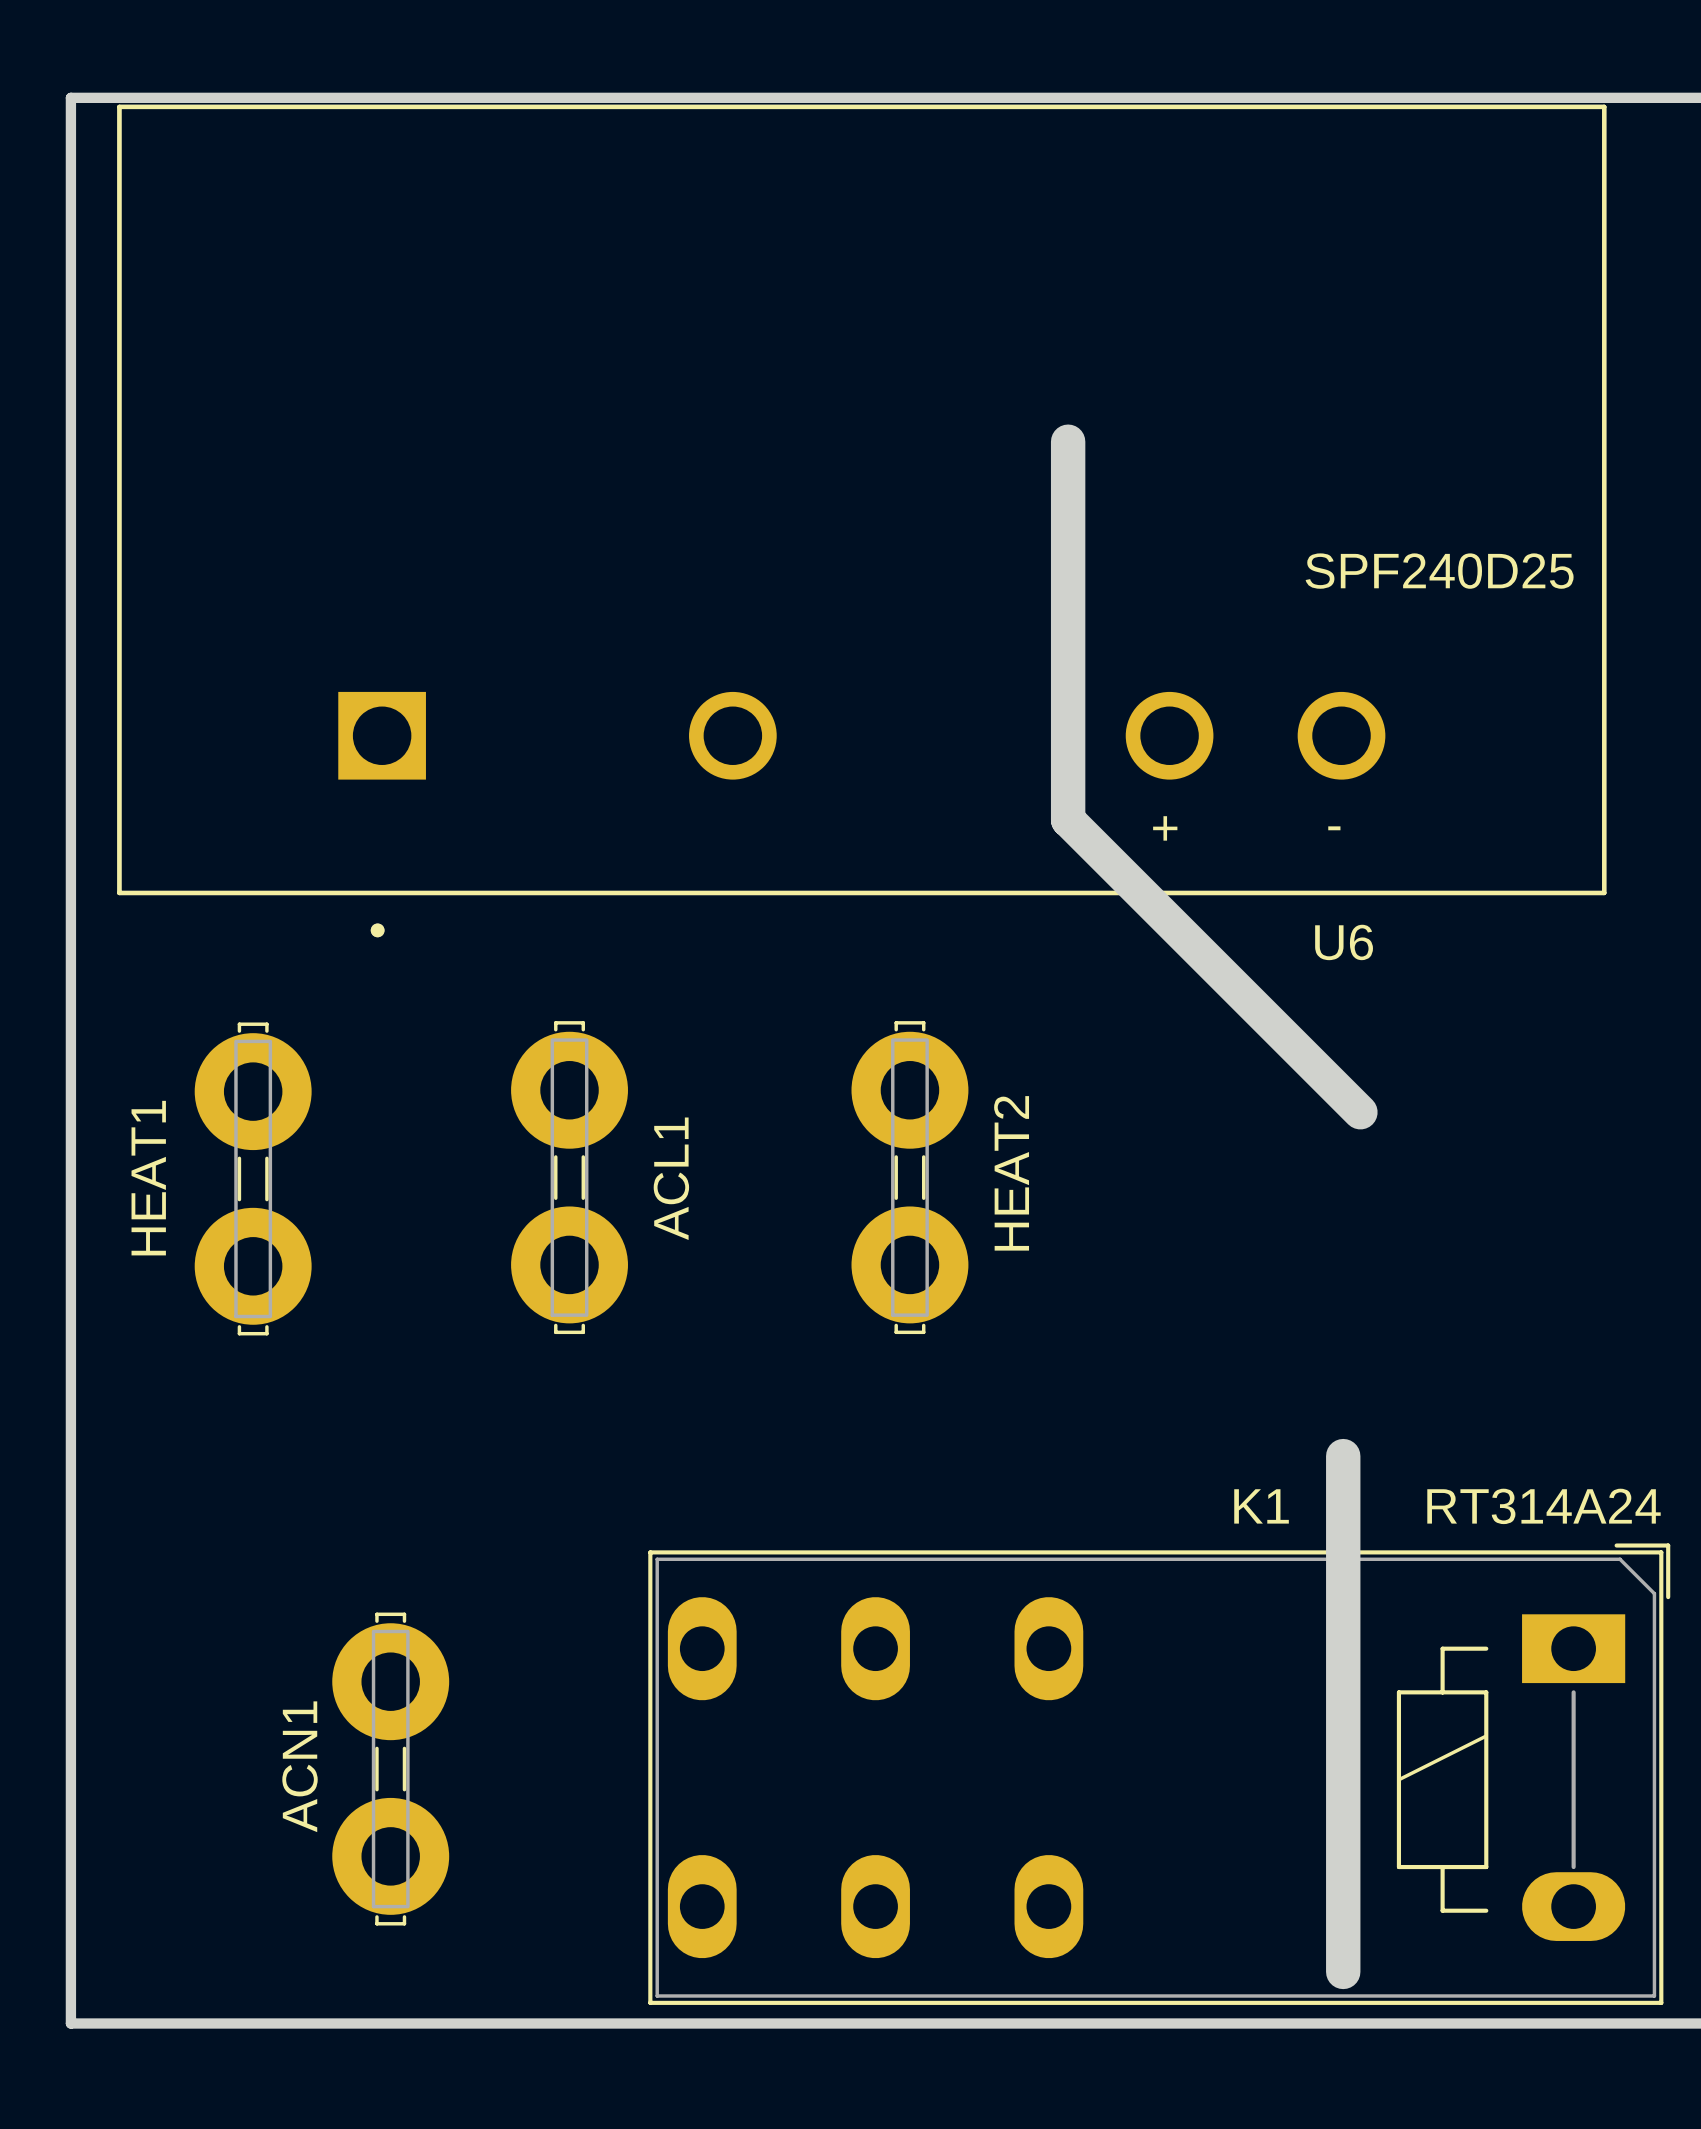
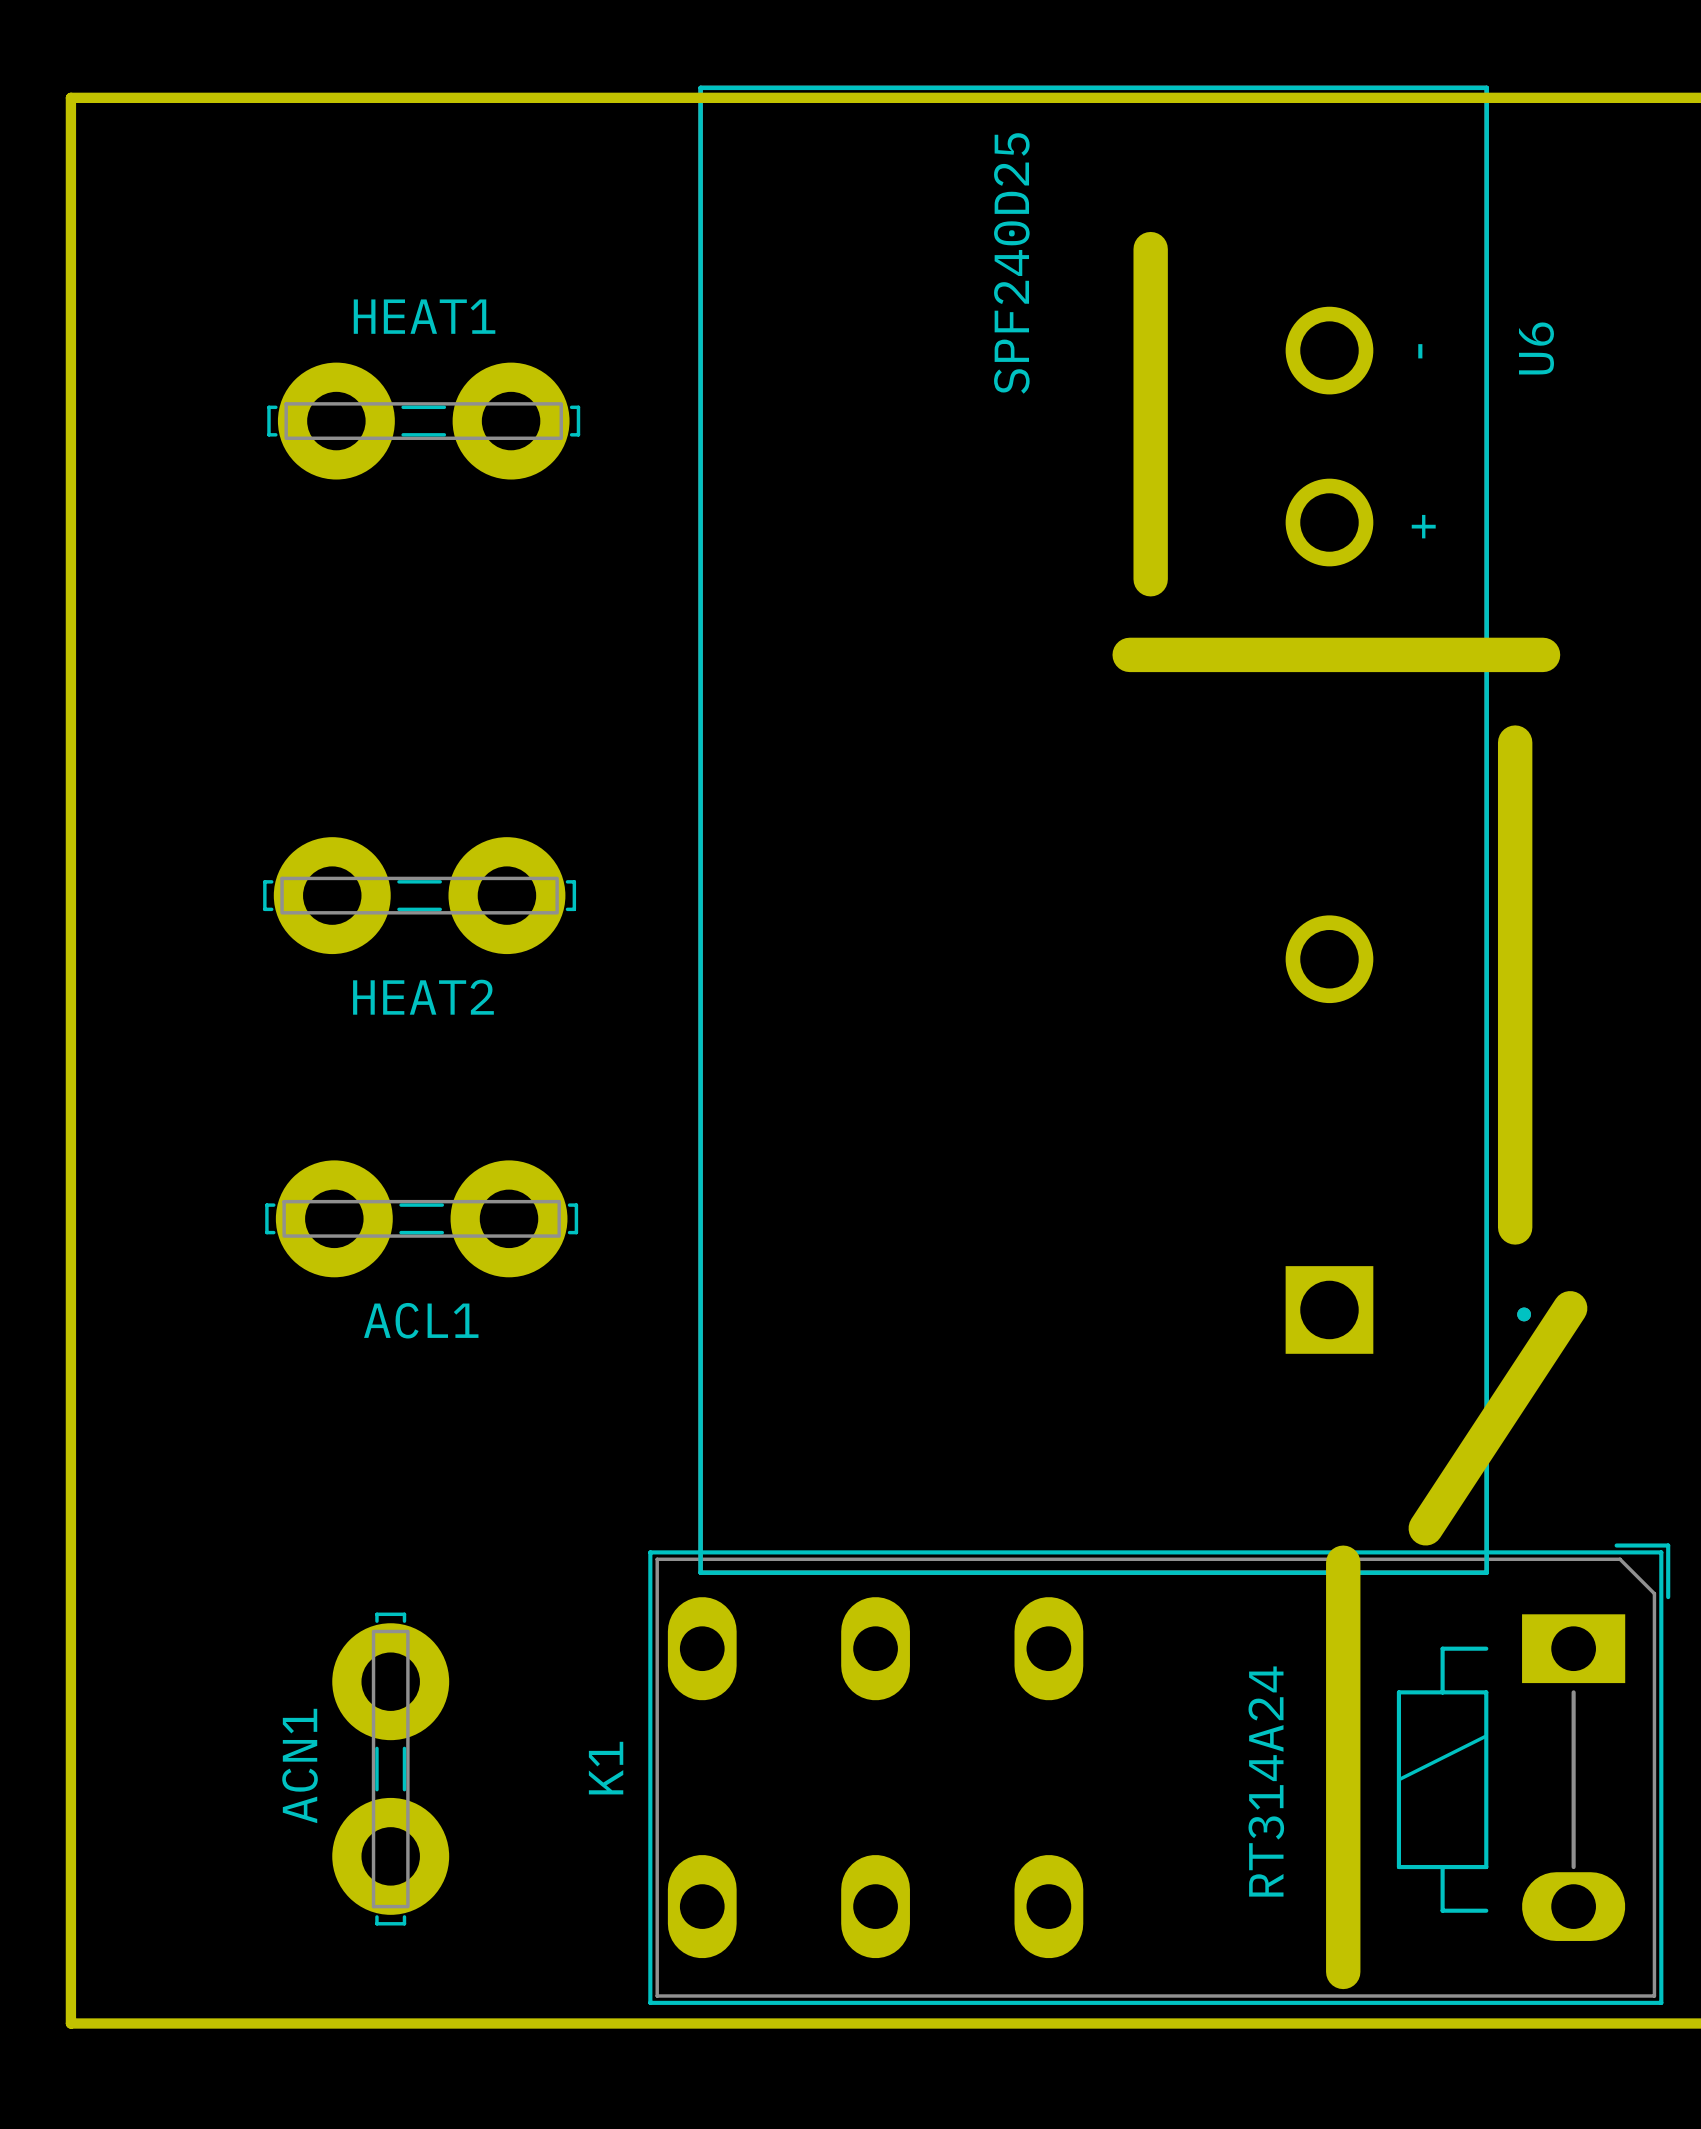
board edge: none -> (1150, 249) (1150, 579)
board edge: (1068, 441) (1068, 819) (1360, 1112) -> none
U6 rotation: 0° (861, 520) -> 90° counterclockwise (1114, 830)
U6 value position: SPF240D25 (1439, 571) -> SPF240D25 (1011, 263)
board edge: none -> (1129, 654) (1543, 654)
board edge: none -> (1515, 742) (1515, 1227)
ACL1 rotation: 0° (569, 1177) -> 90° clockwise (421, 1218)
HEAT2 rotation: 0° (909, 1177) -> 90° clockwise (419, 895)
HEAT2 position: (909, 1177) -> (419, 895)
HEAT1 rotation: 0° (253, 1178) -> 90° clockwise (423, 421)
HEAT1 position: (253, 1178) -> (423, 421)
board edge: none -> (1570, 1308) (1425, 1528)
board edge: (1343, 1456) (1343, 1562) -> none
K1 name rotation: 0° (1261, 1506) -> 90° counterclockwise (606, 1768)
K1 name position: K1 (1261, 1506) -> K1 (606, 1768)
K1 value rotation: 0° (1544, 1506) -> 90° counterclockwise (1266, 1781)
K1 value position: RT314A24 (1544, 1506) -> RT314A24 (1266, 1781)

